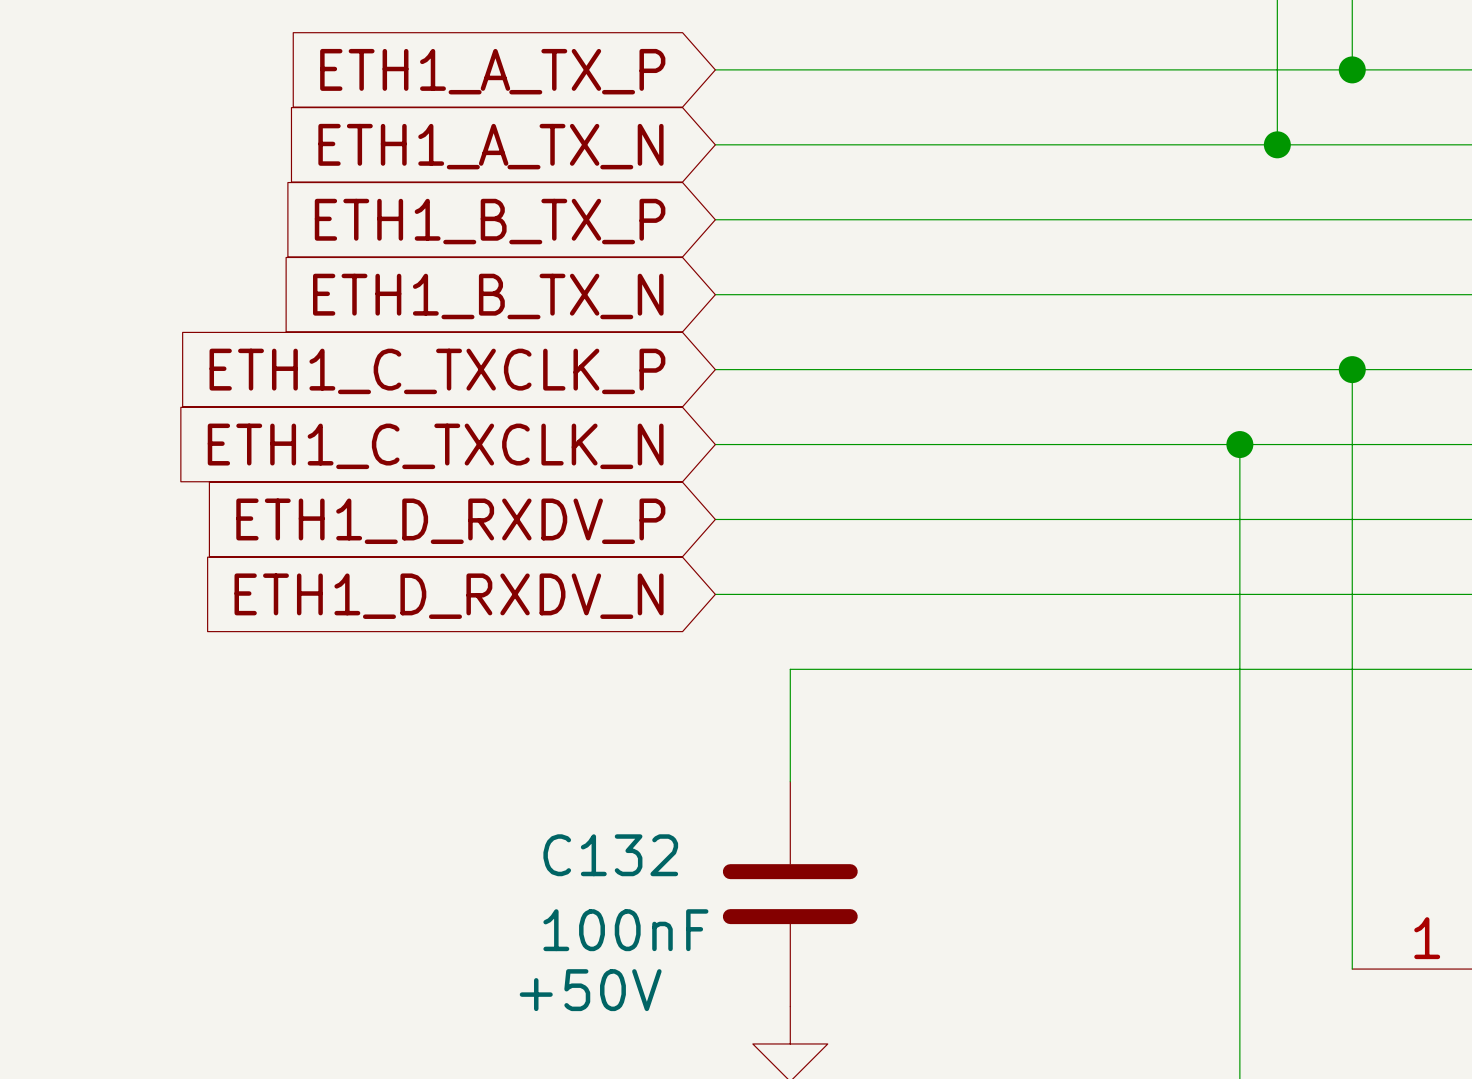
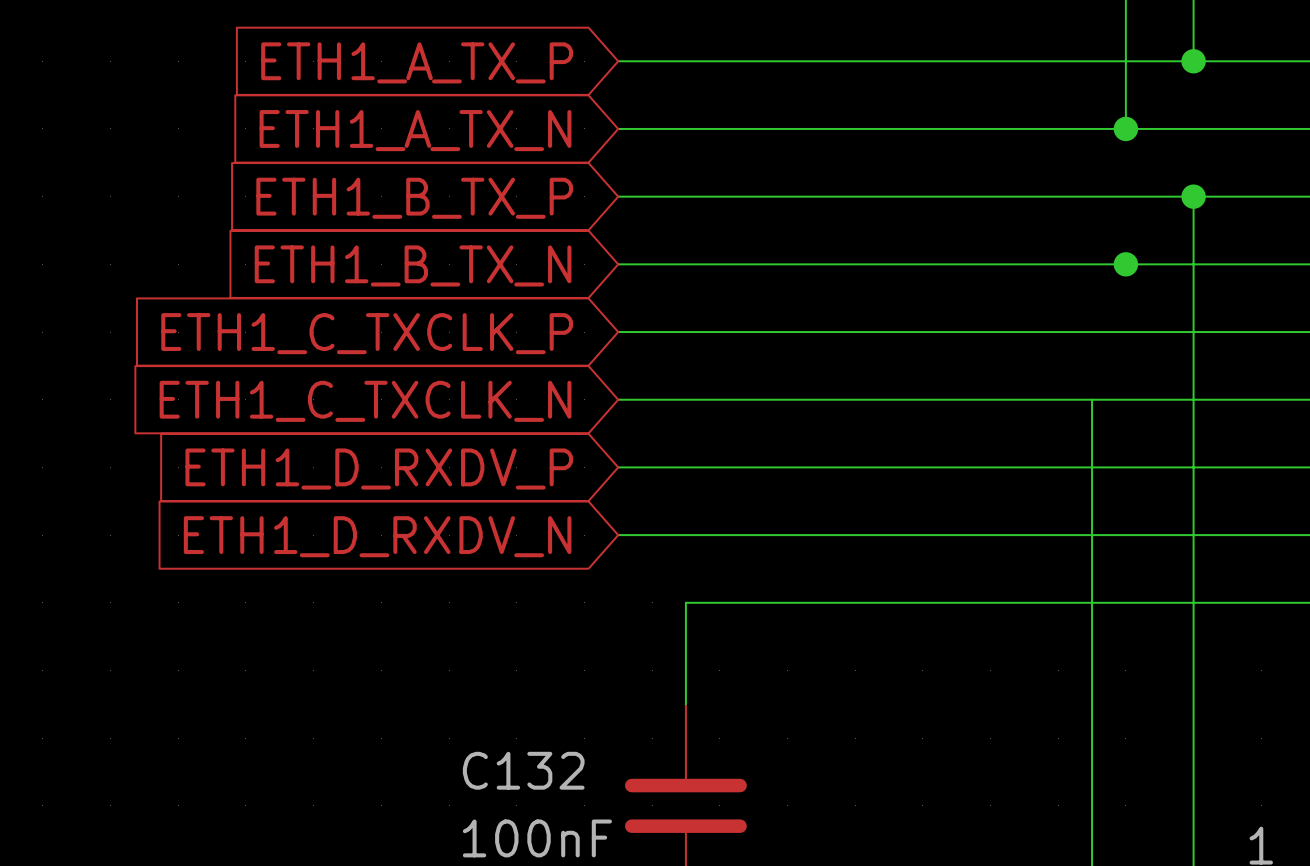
wire: none -> (1193, 196) (1193, 332)
junction: none -> (1193, 196)
junction: none -> (1125, 264)
junction: (1352, 369) -> none
junction: (1239, 444) -> none

